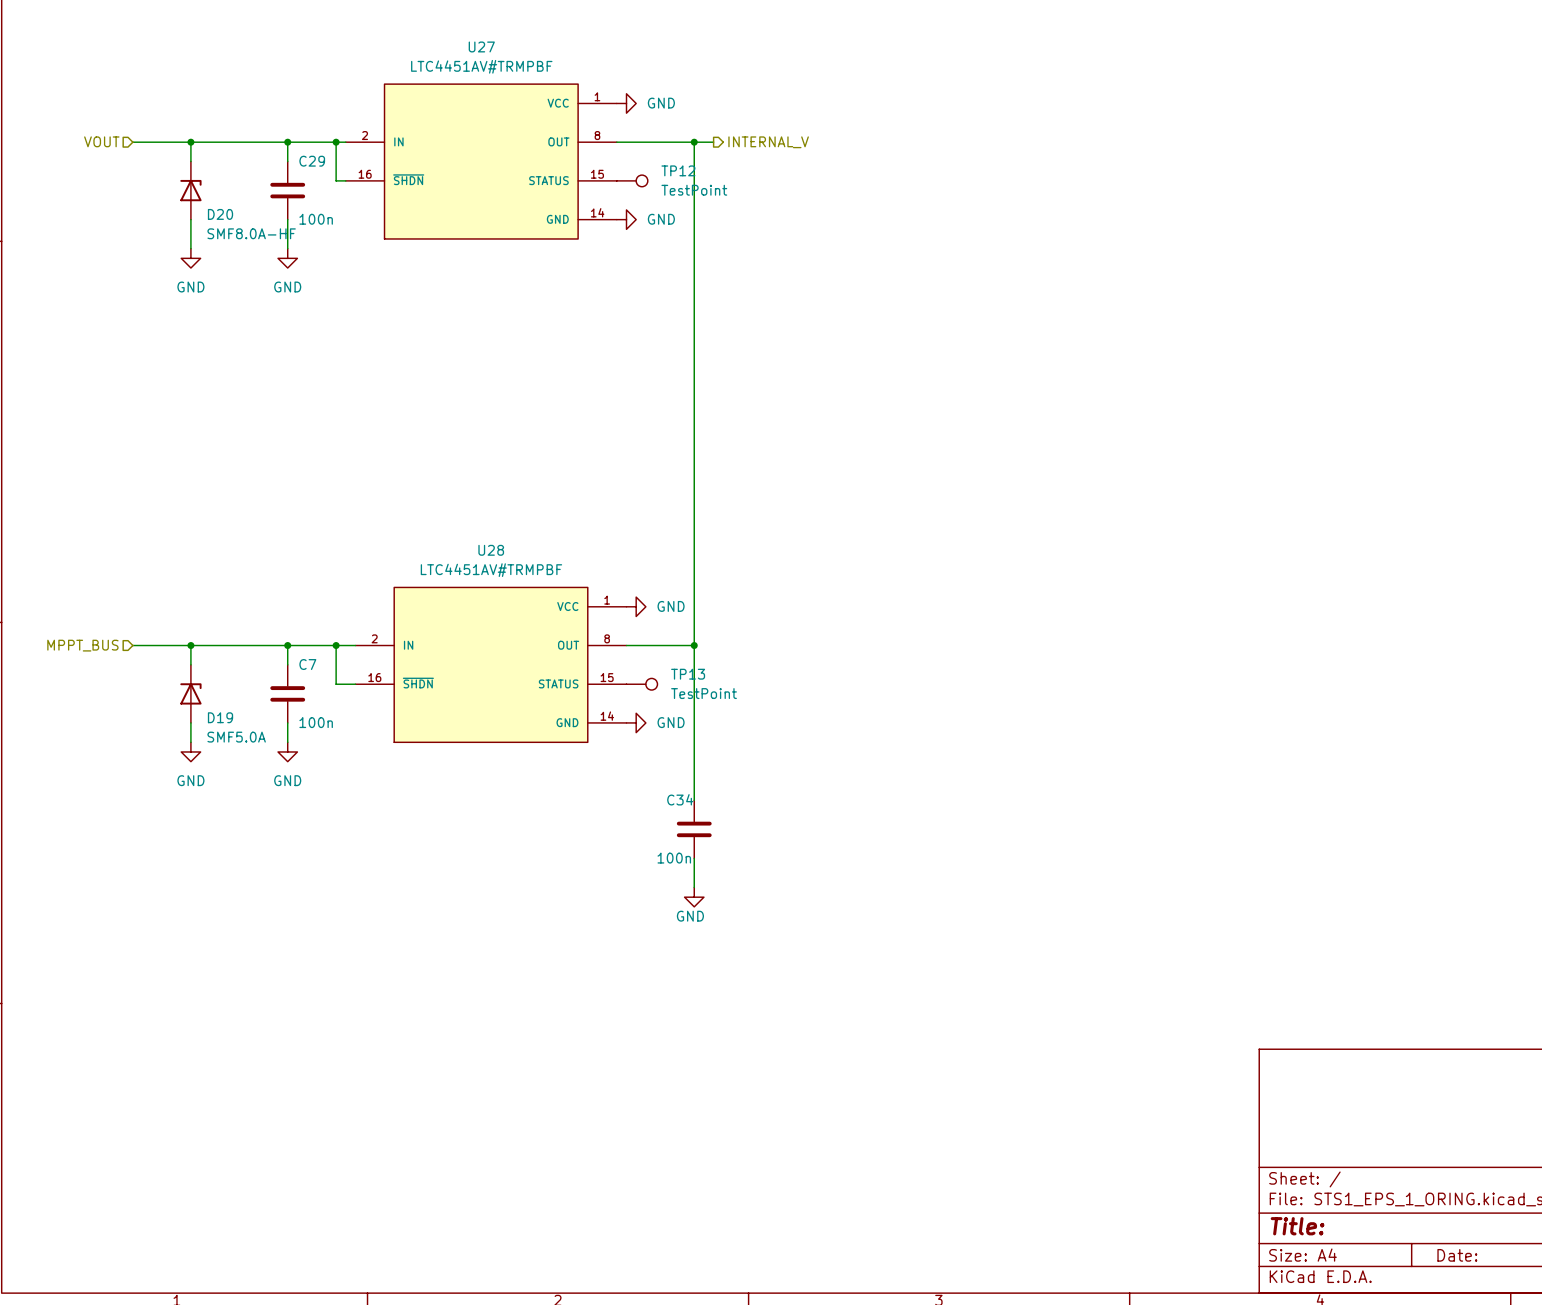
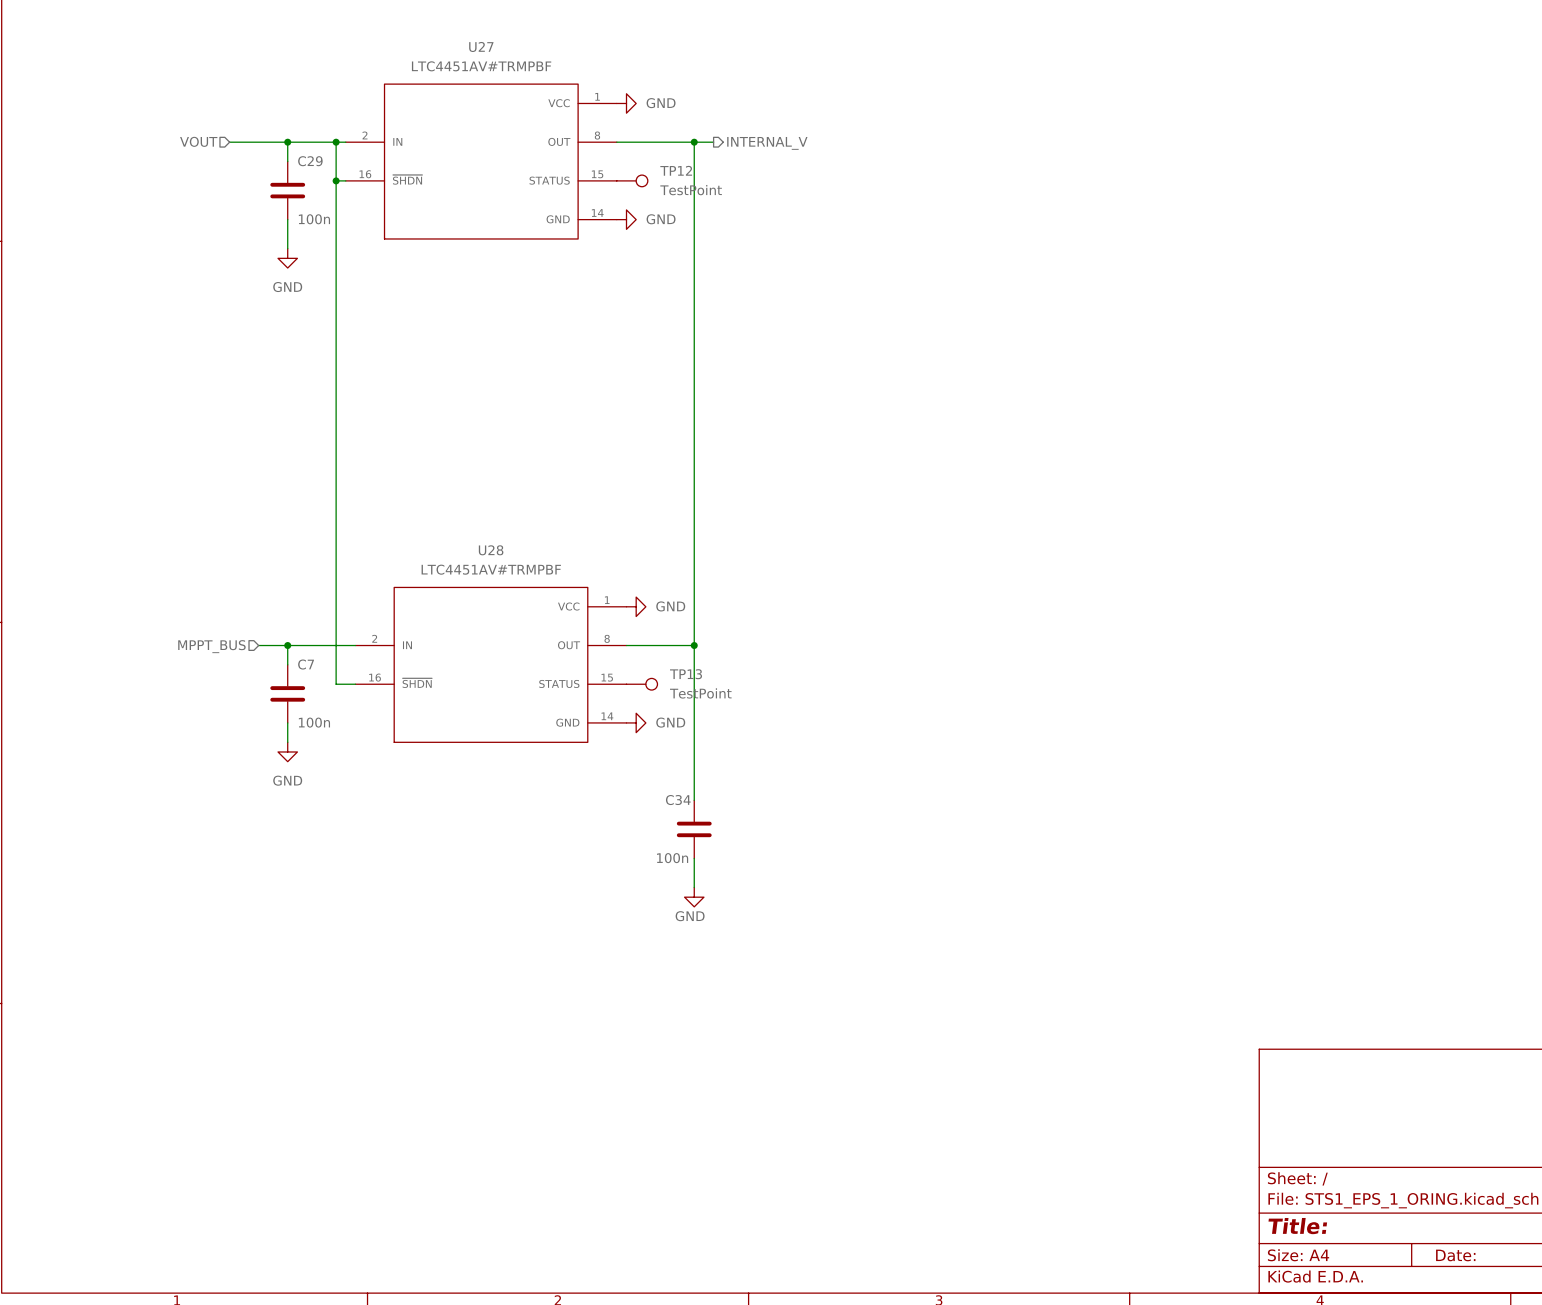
hierarchical label position: VOUT (101, 141) -> VOUT (198, 141)
wire: (132, 142) (229, 142) -> none
wire: (190, 142) (190, 161) -> none
junction: (190, 142) -> none
wire: none -> (336, 180) (336, 645)
junction: none -> (336, 180)
D20: SMF8.0A-HF (190, 190) -> none
wire: (190, 219) (190, 248) -> none
power symbol: GND (190, 258) -> none
hierarchical label position: MPPT_BUS (82, 645) -> MPPT_BUS (211, 646)
wire: (132, 645) (258, 645) -> none
wire: (190, 645) (190, 664) -> none
junction: (190, 645) -> none
junction: (336, 645) -> none
D19: SMF5.0A (190, 693) -> none
wire: (190, 722) (190, 742) -> none
power symbol: GND (190, 751) -> none

